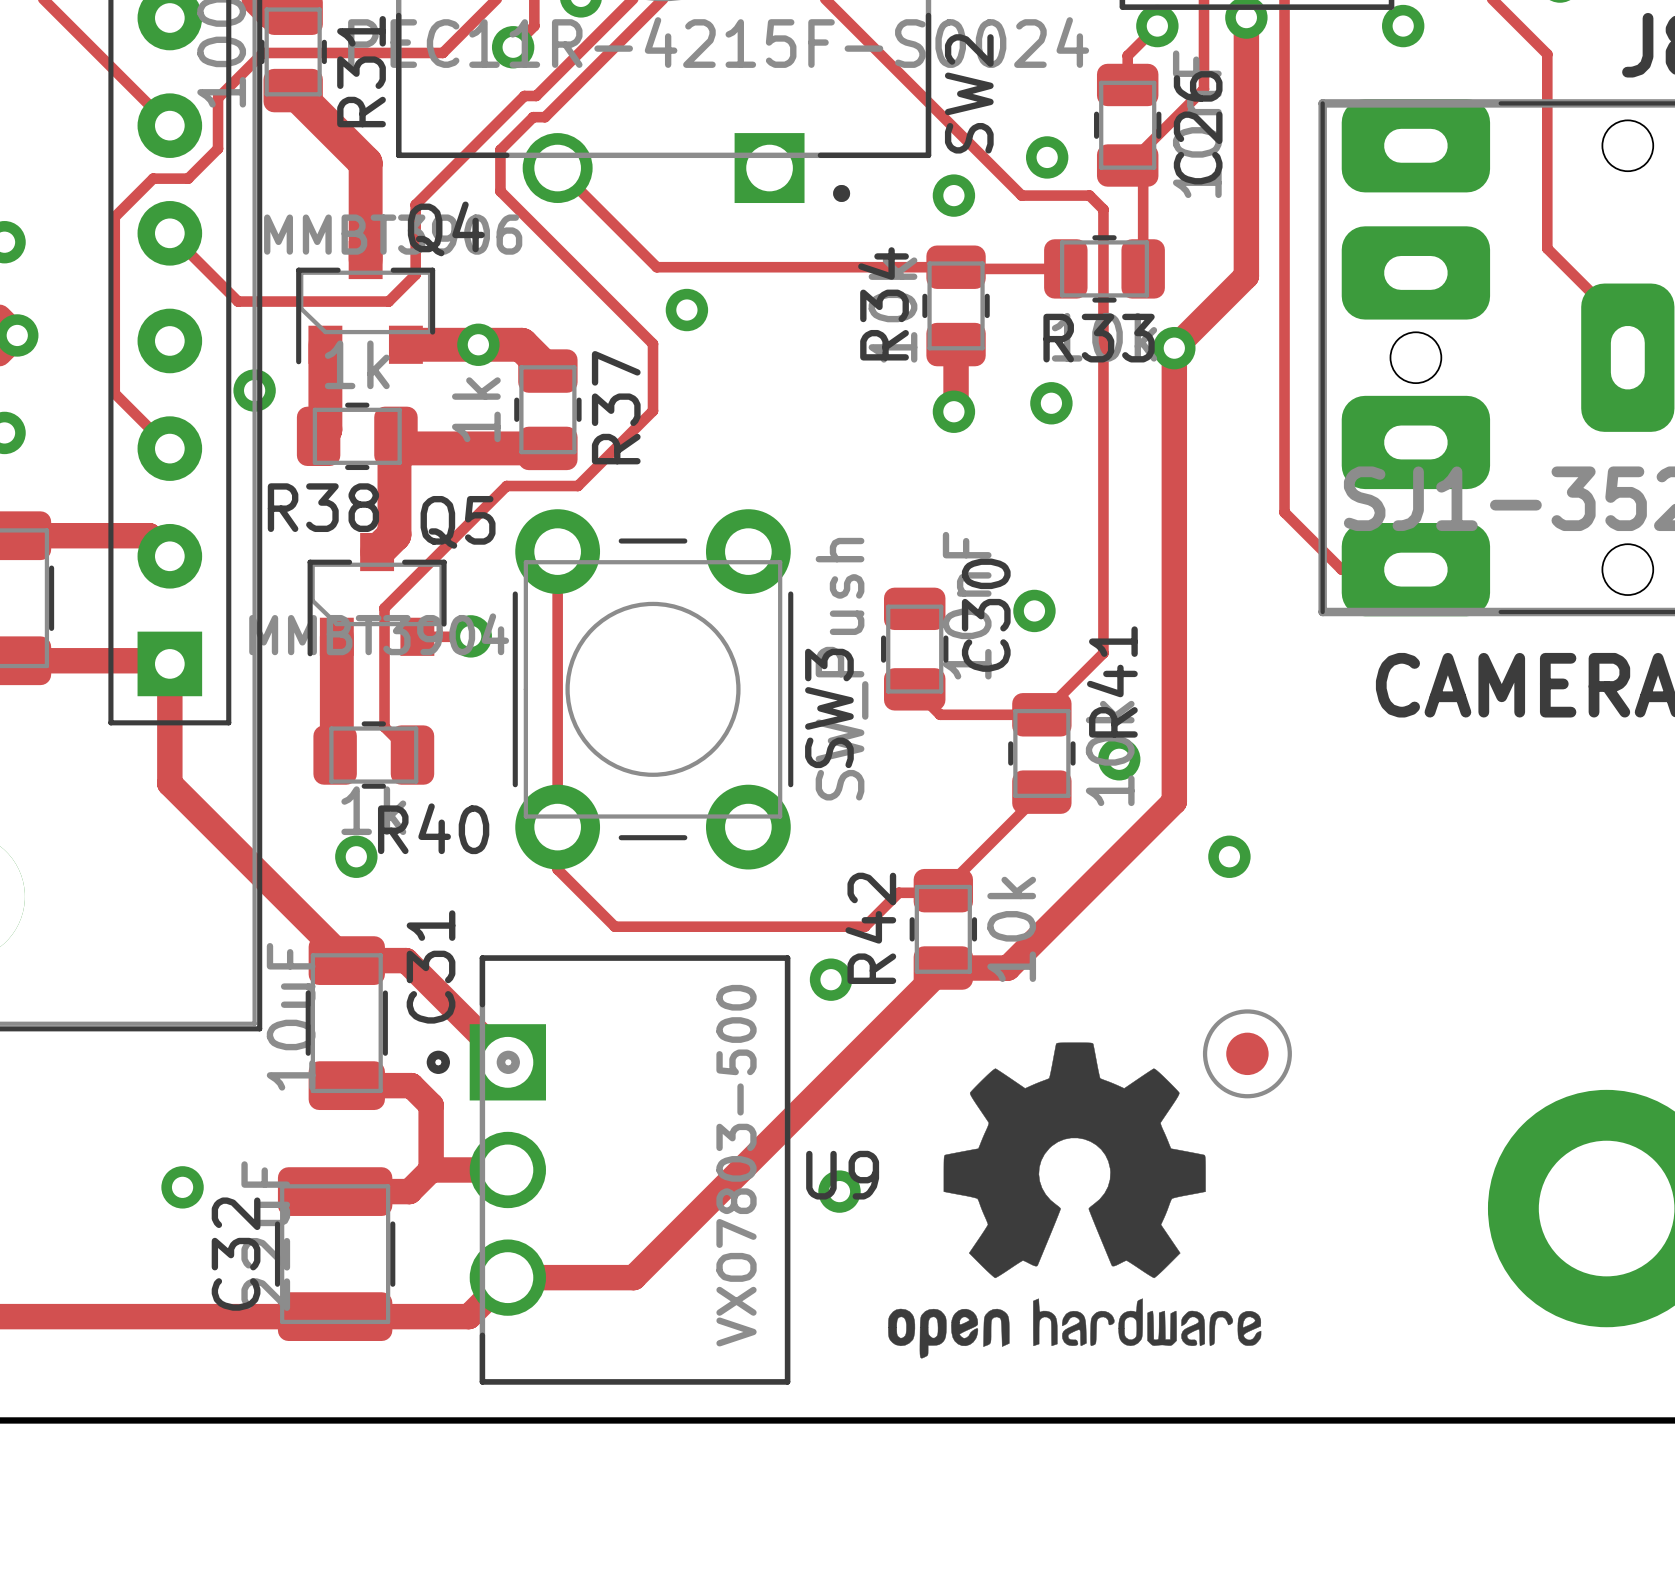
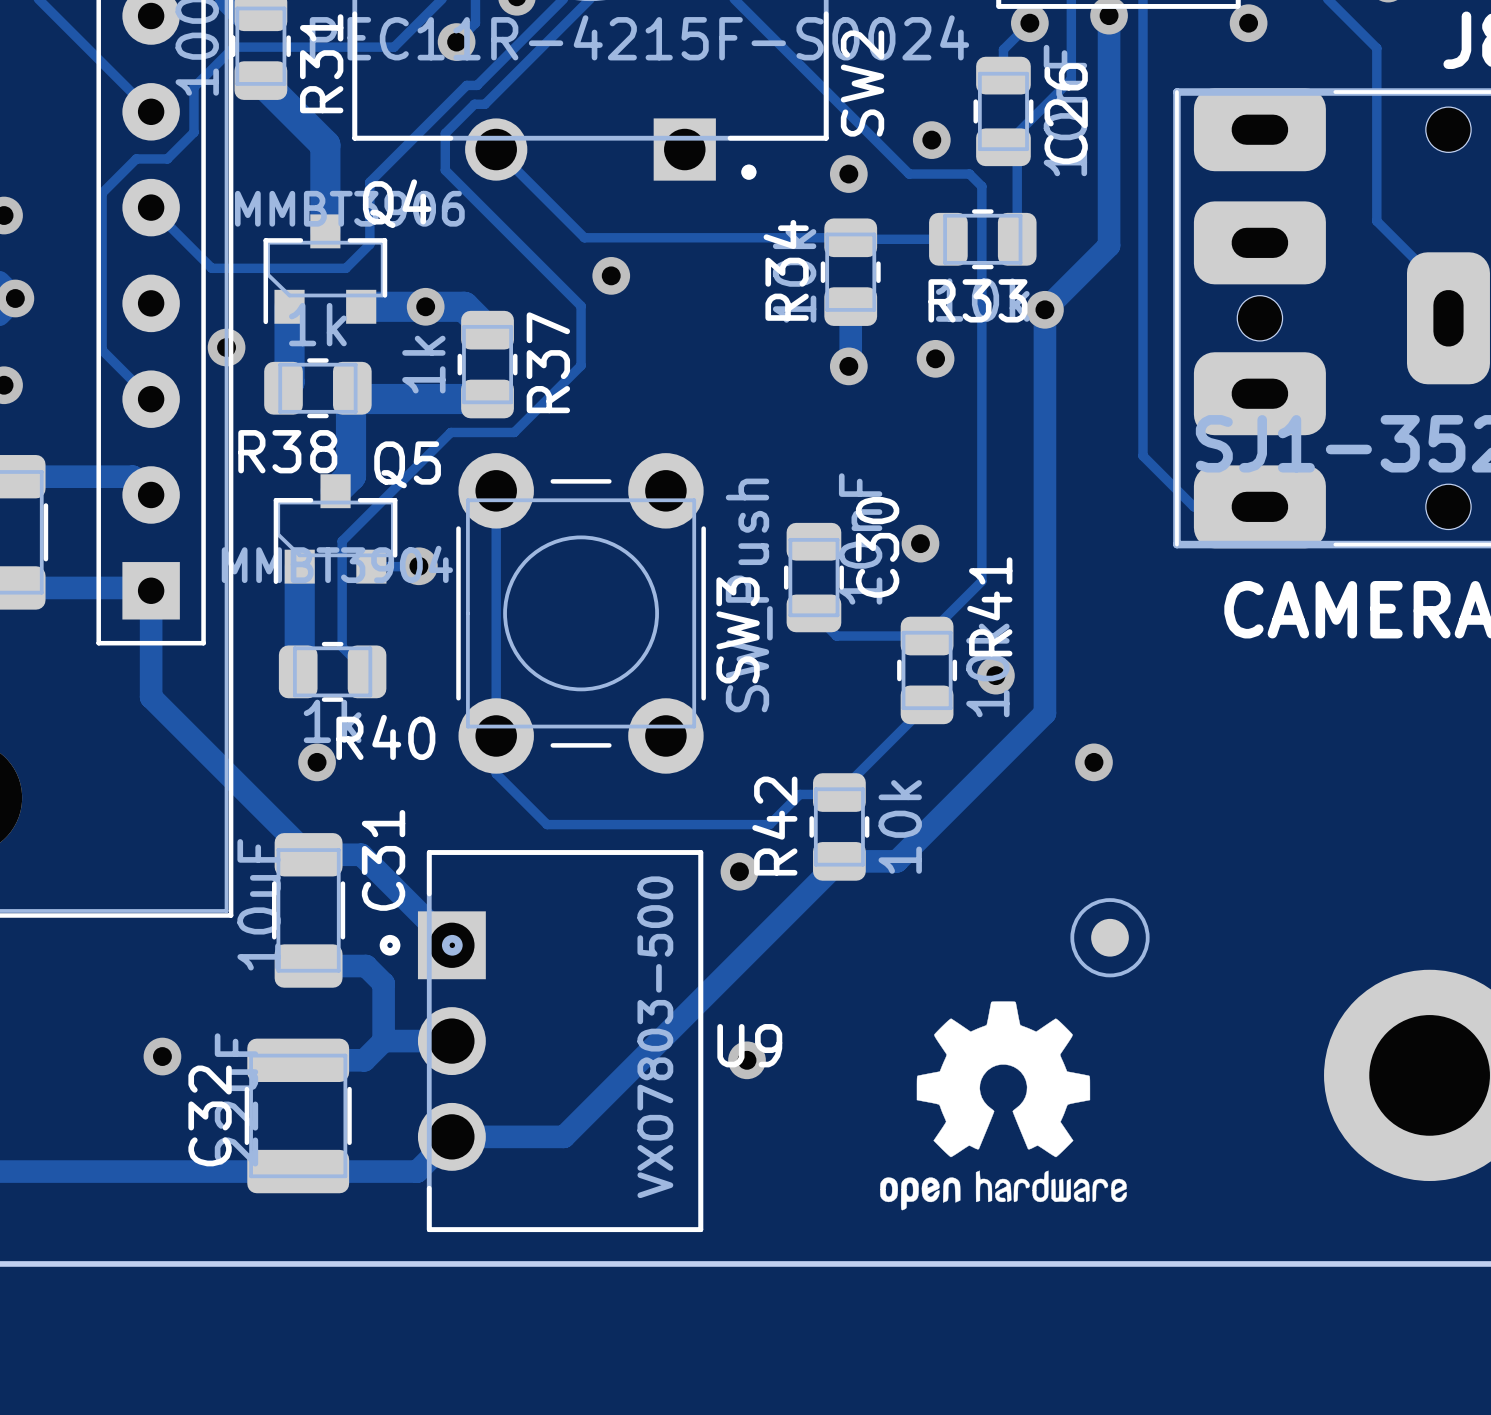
drawing: [888, 1042, 1262, 1359] -> none
drawing: none -> [880, 1001, 1127, 1211]

